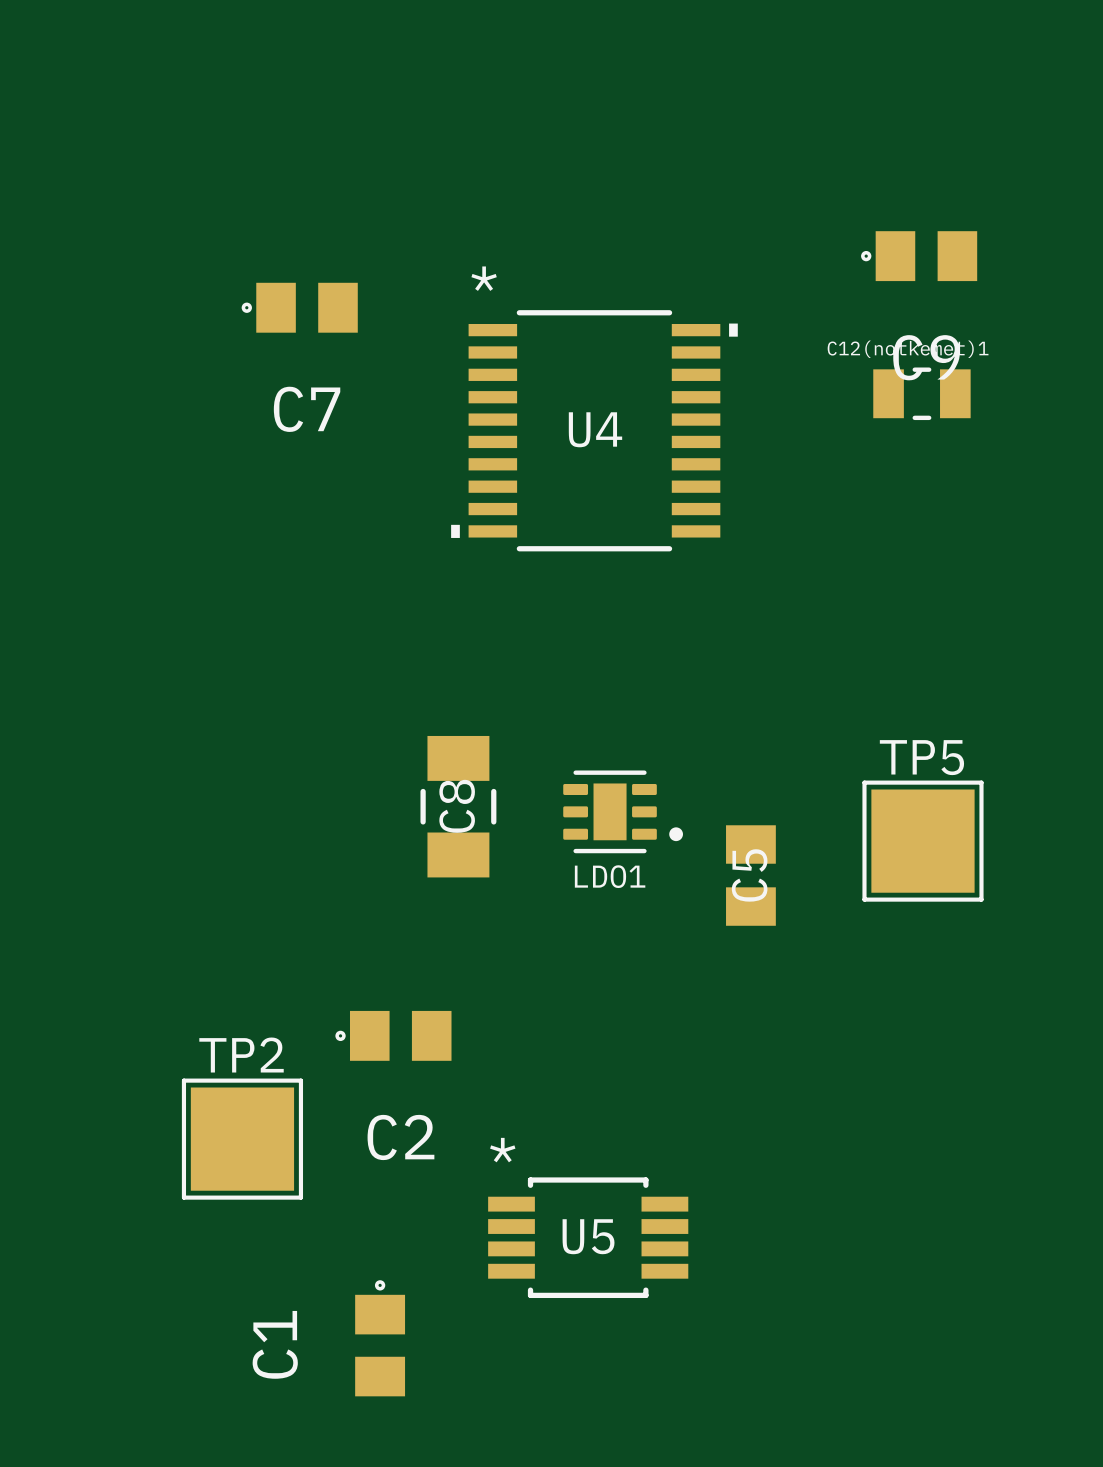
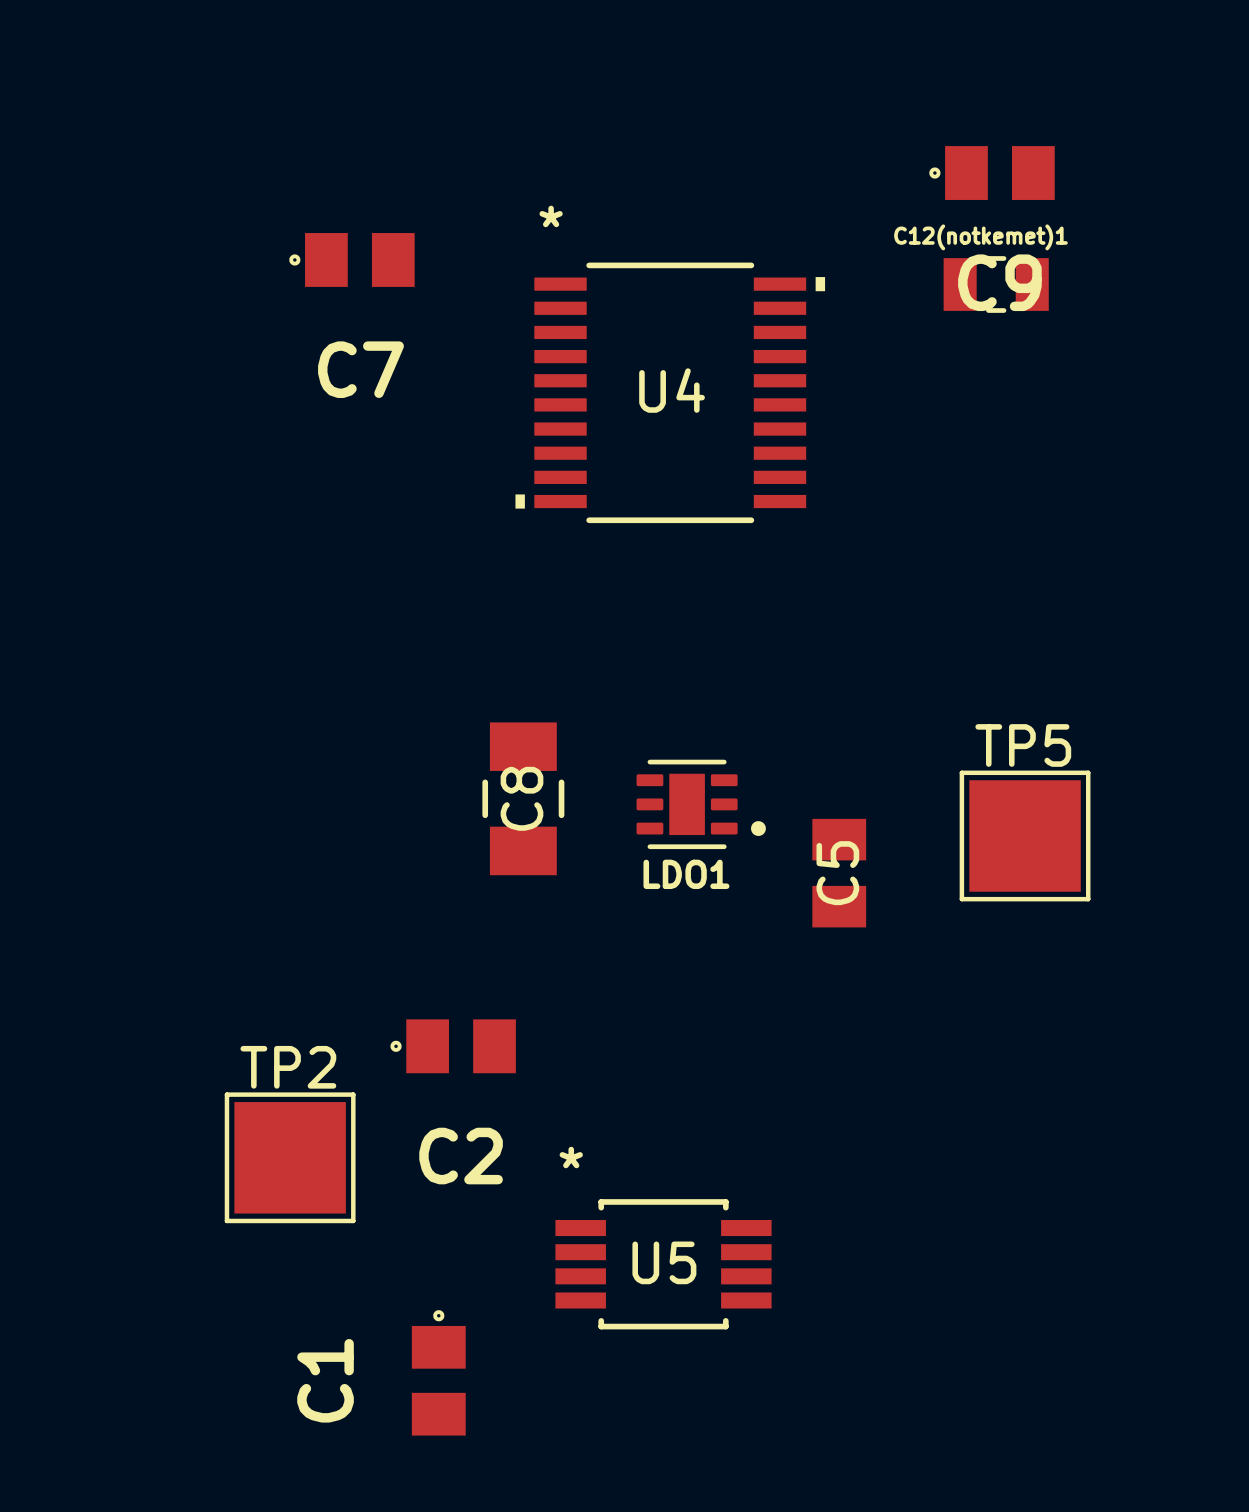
C9 position: (919, 256) -> (992, 173)
C12(notkemet)1 position: (921, 393) -> (996, 284)

